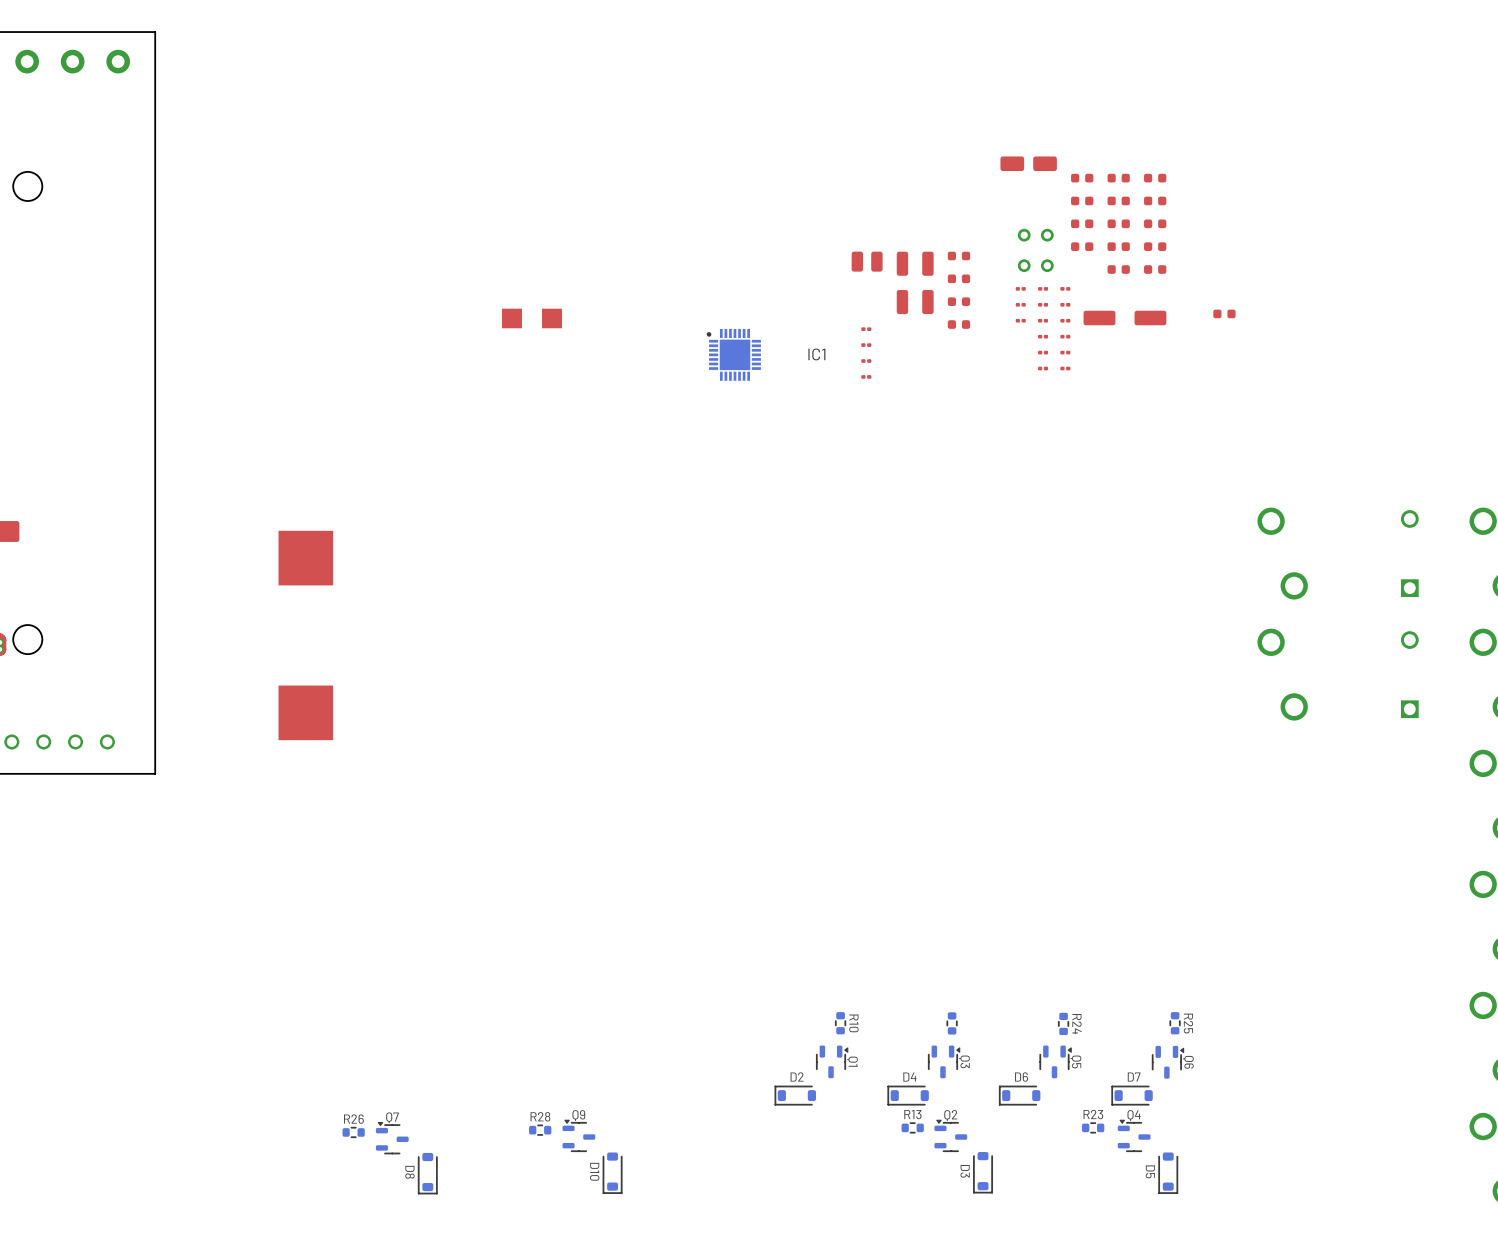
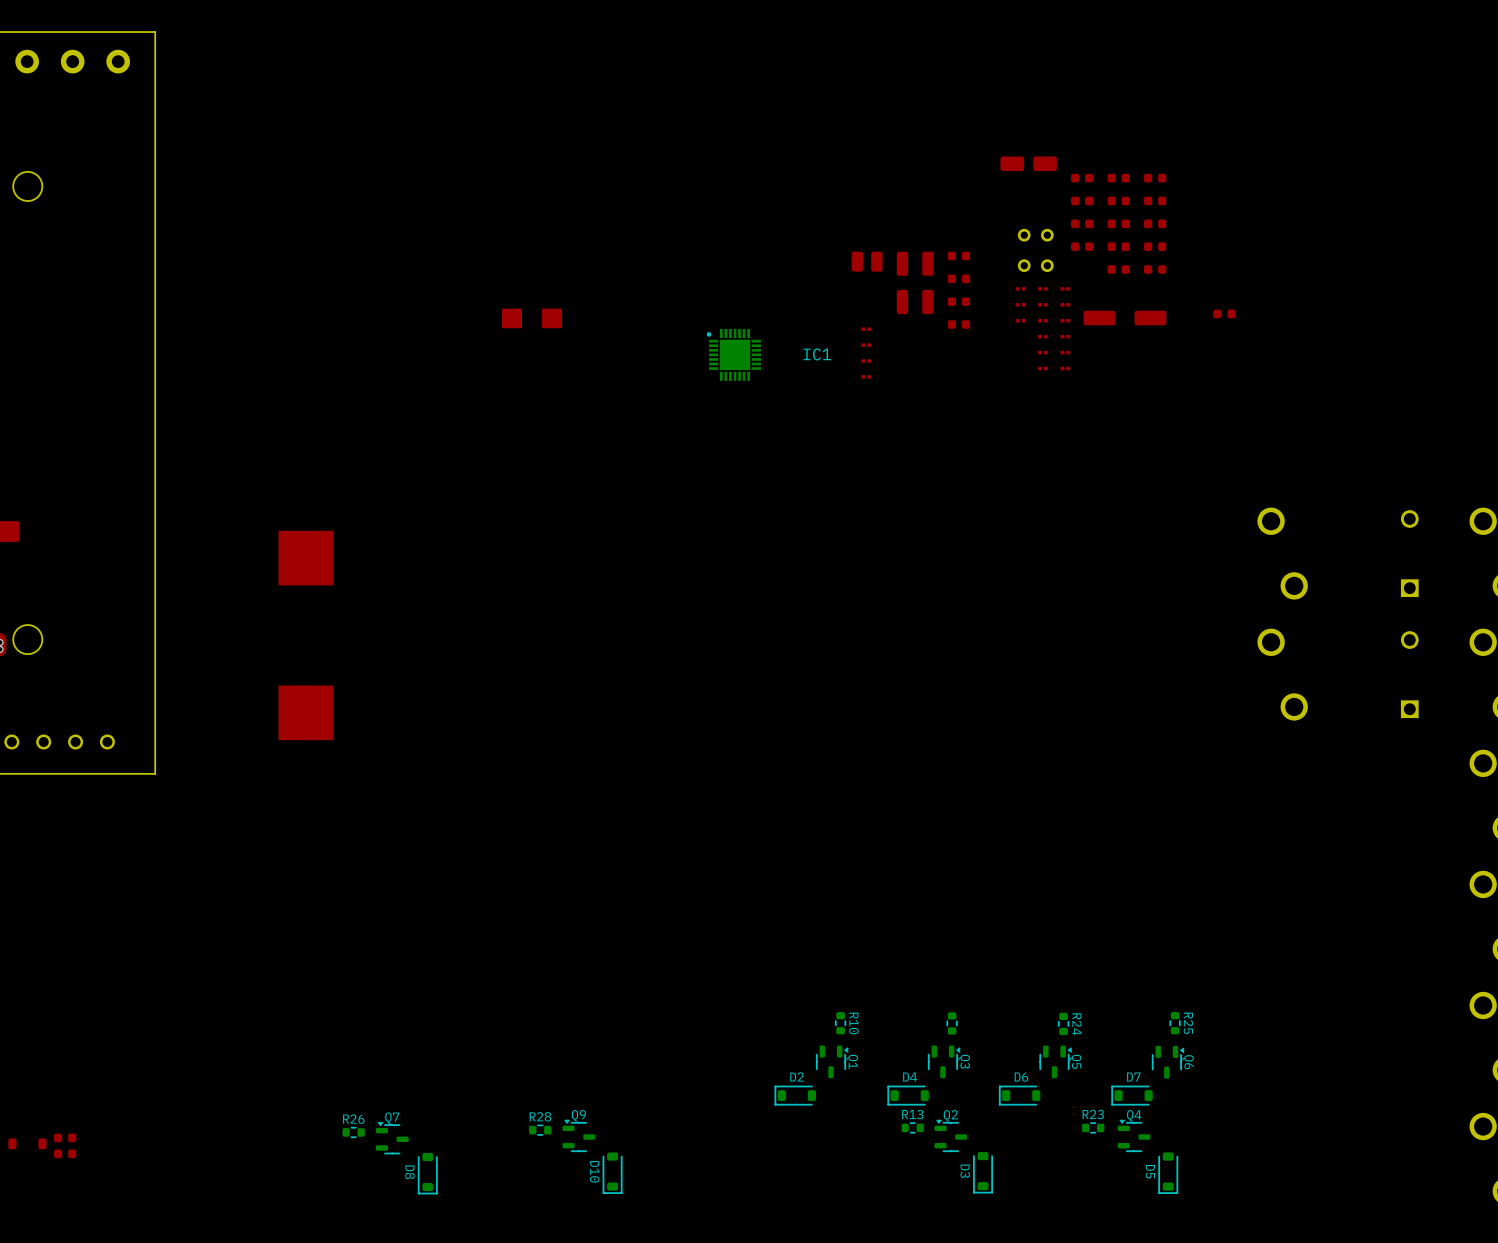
part: none -> (65, 1137)
part: none -> (27, 1143)
part: none -> (65, 1153)

